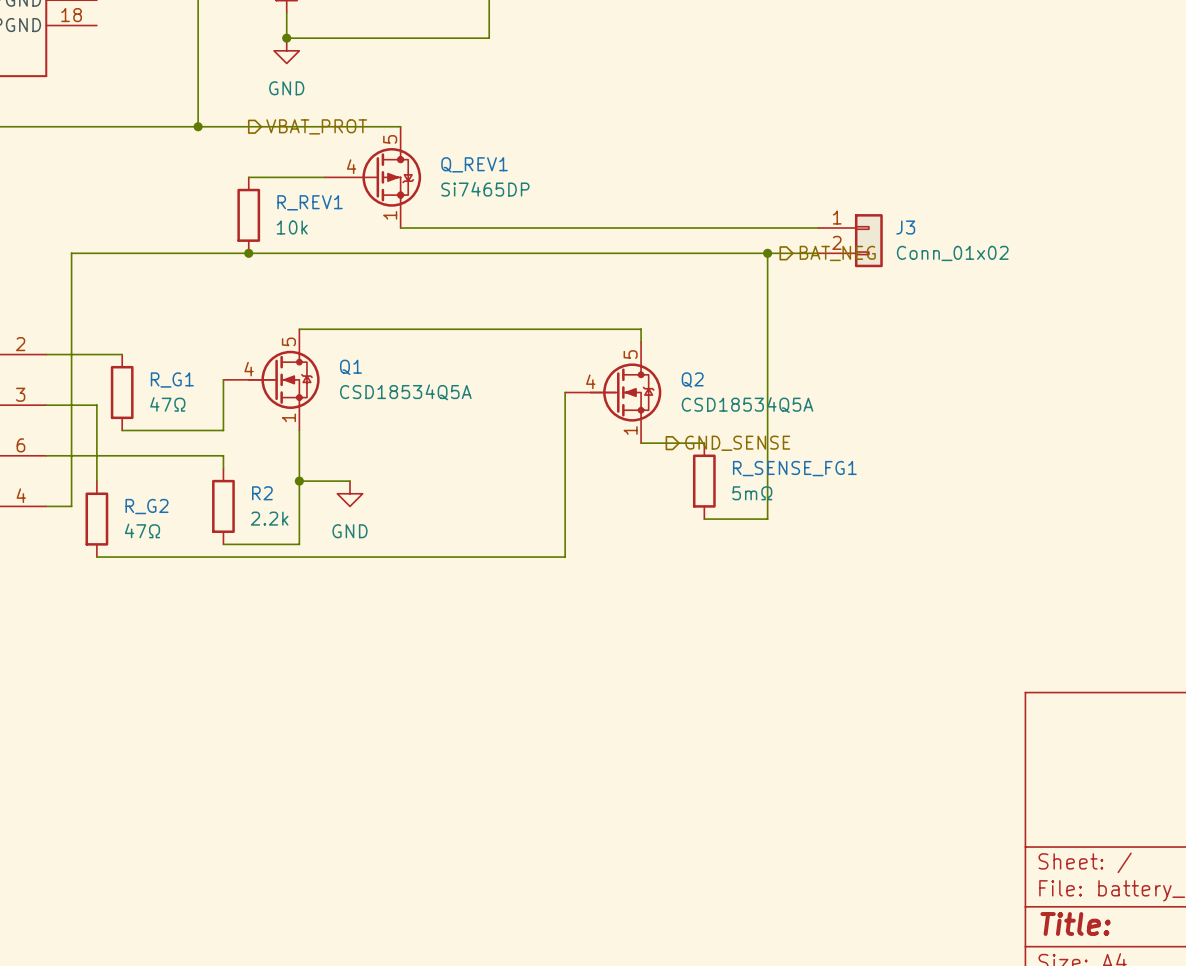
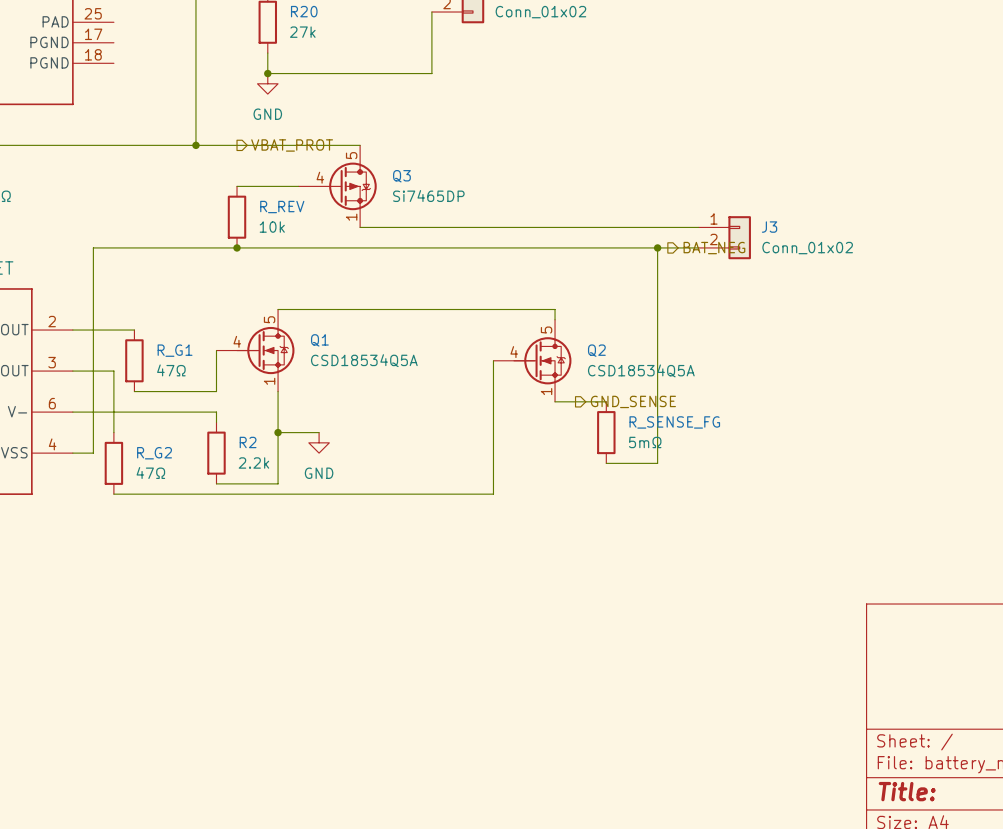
Q_REV1 name: Q_REV1 (474, 164) -> Q3 (401, 176)
R_REV1 name: R_REV1 (310, 202) -> R_REV (282, 207)
R_SENSE_FG1 name: R_SENSE_FG1 (794, 468) -> R_SENSE_FG (674, 422)

